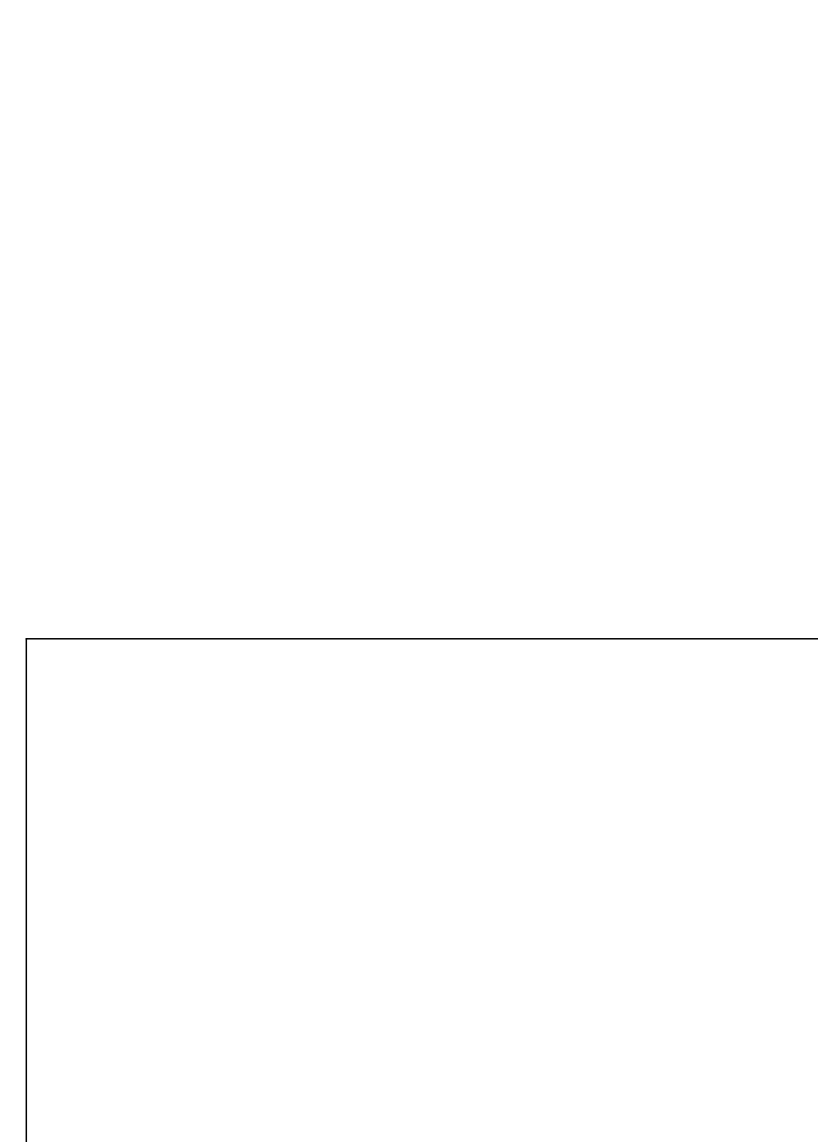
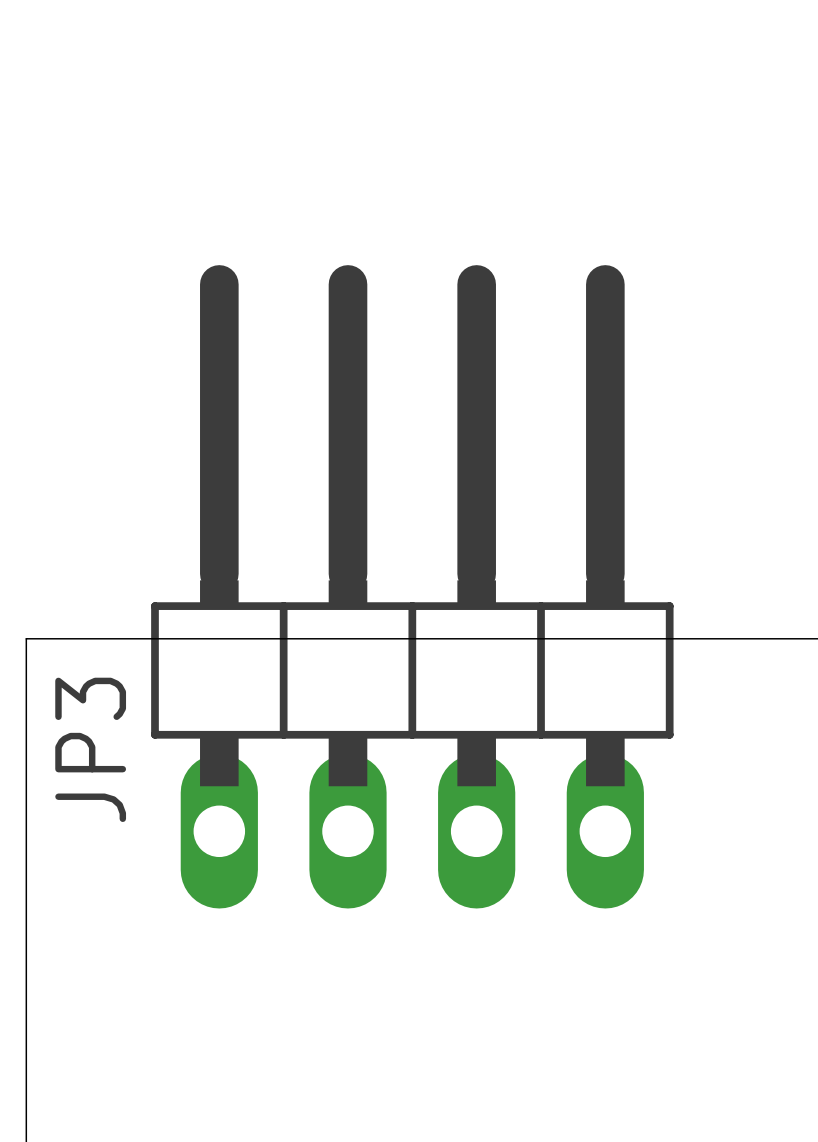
JP3: none -> (412, 586)

